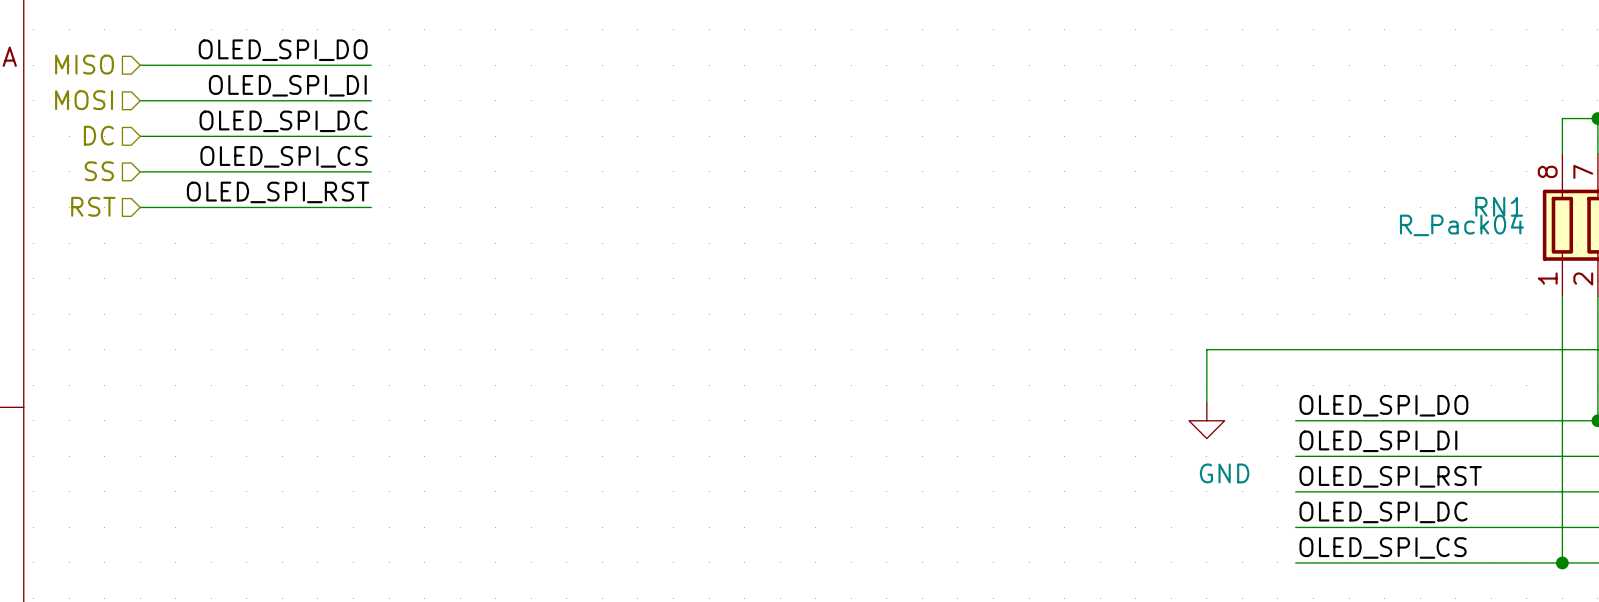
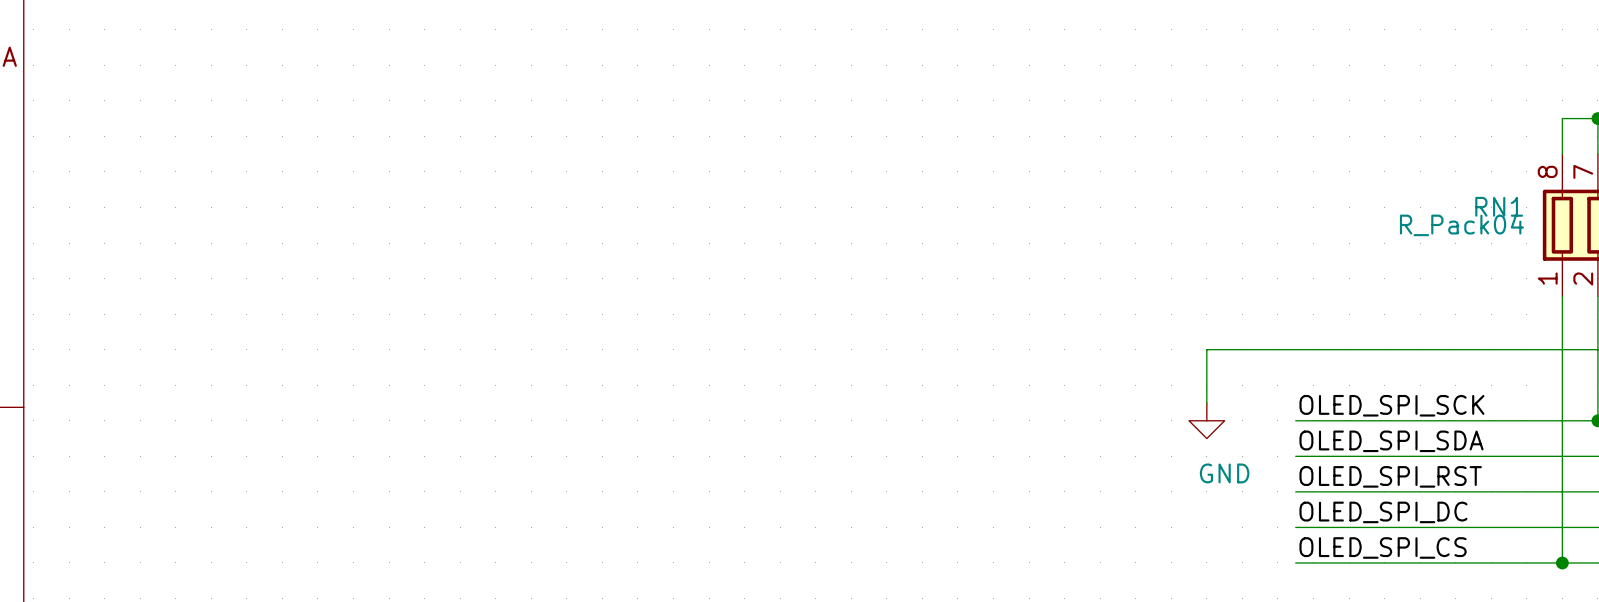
label: OLED_SPI_DO (283, 50) -> none
hierarchical label: MISO (84, 64) -> none
wire: (140, 65) (371, 65) -> none
label: OLED_SPI_DI (287, 85) -> none
hierarchical label: MOSI (84, 100) -> none
wire: (140, 100) (371, 100) -> none
label: OLED_SPI_DC (283, 121) -> none
hierarchical label: DC (98, 135) -> none
wire: (140, 136) (371, 136) -> none
label: OLED_SPI_CS (283, 156) -> none
hierarchical label: SS (99, 171) -> none
wire: (140, 171) (371, 171) -> none
label: OLED_SPI_RST (278, 192) -> none
hierarchical label: RST (93, 206) -> none
wire: (140, 207) (371, 207) -> none
label: OLED_SPI_DO (1383, 405) -> OLED_SPI_SCK (1391, 405)
label: OLED_SPI_DI (1378, 441) -> OLED_SPI_SDA (1391, 441)

